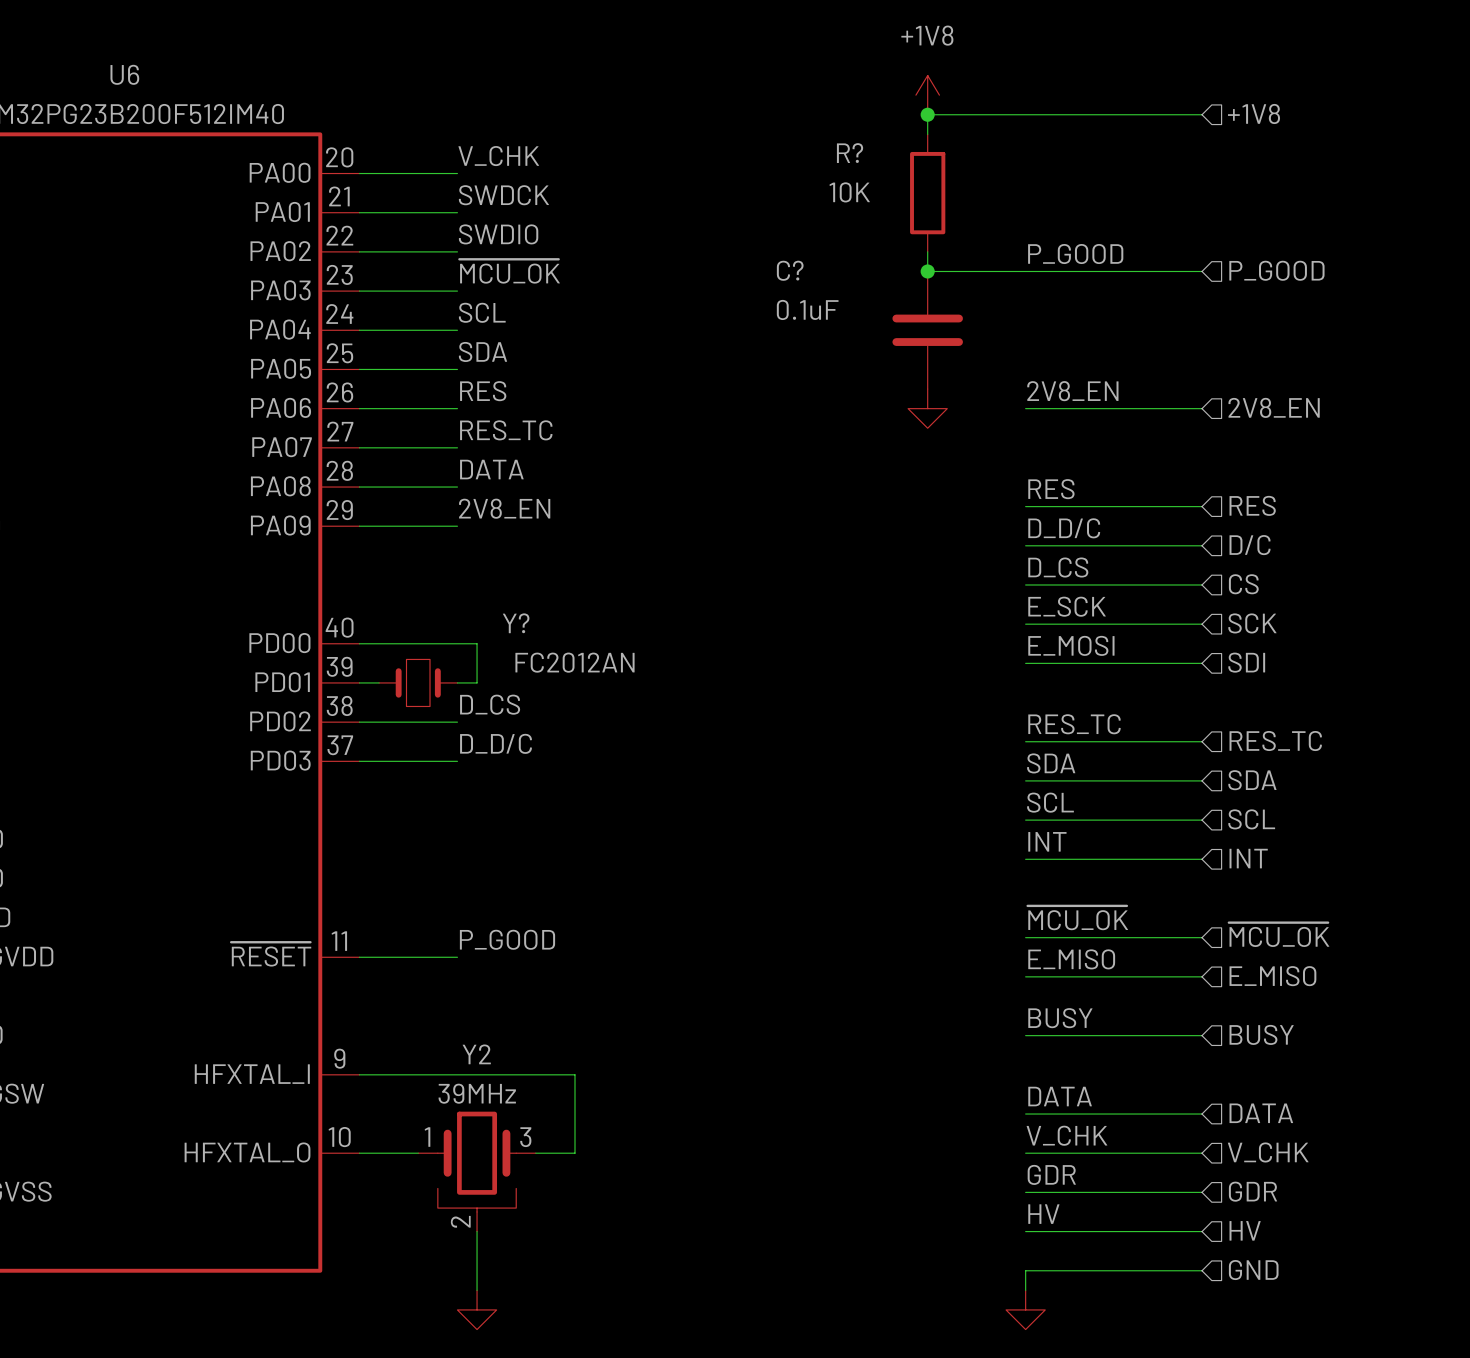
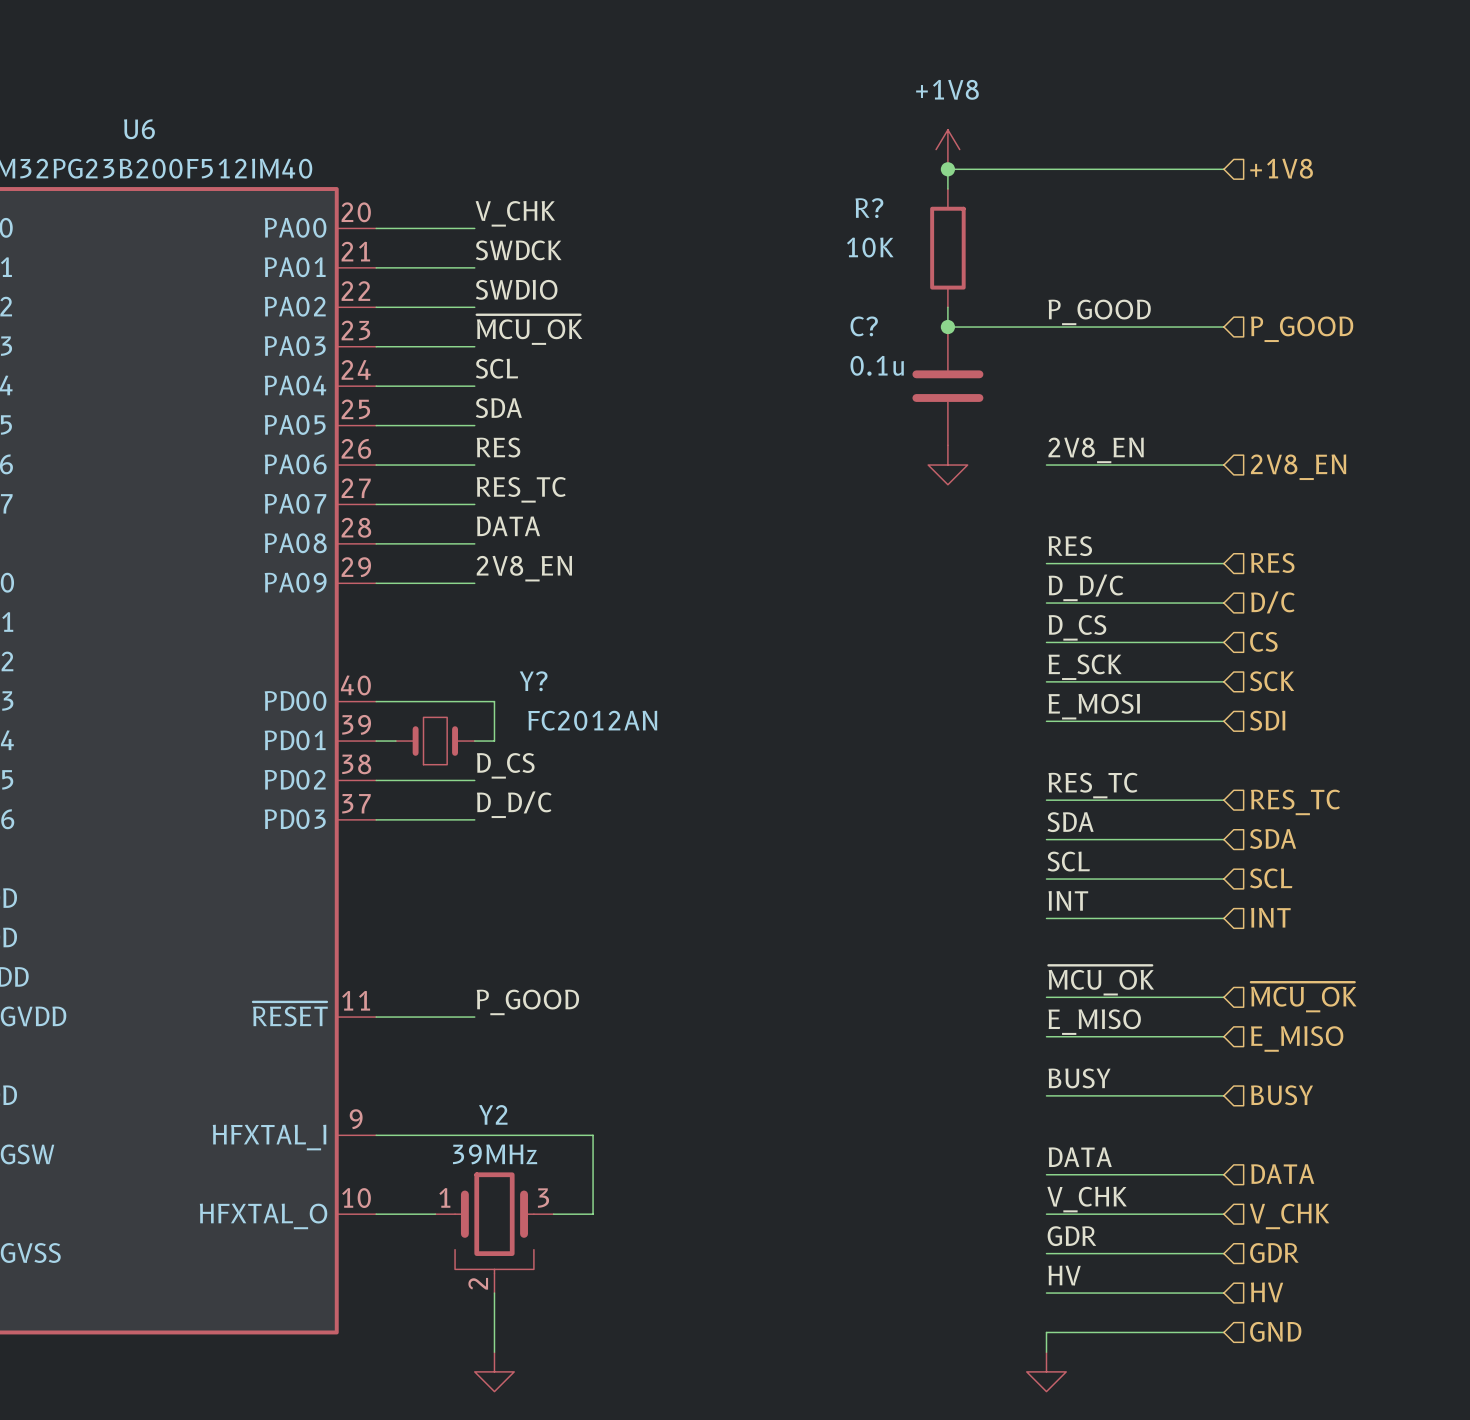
C? name position: C? (790, 270) -> C? (864, 326)
C? value: 0.1uF (807, 309) -> 0.1u (877, 365)

